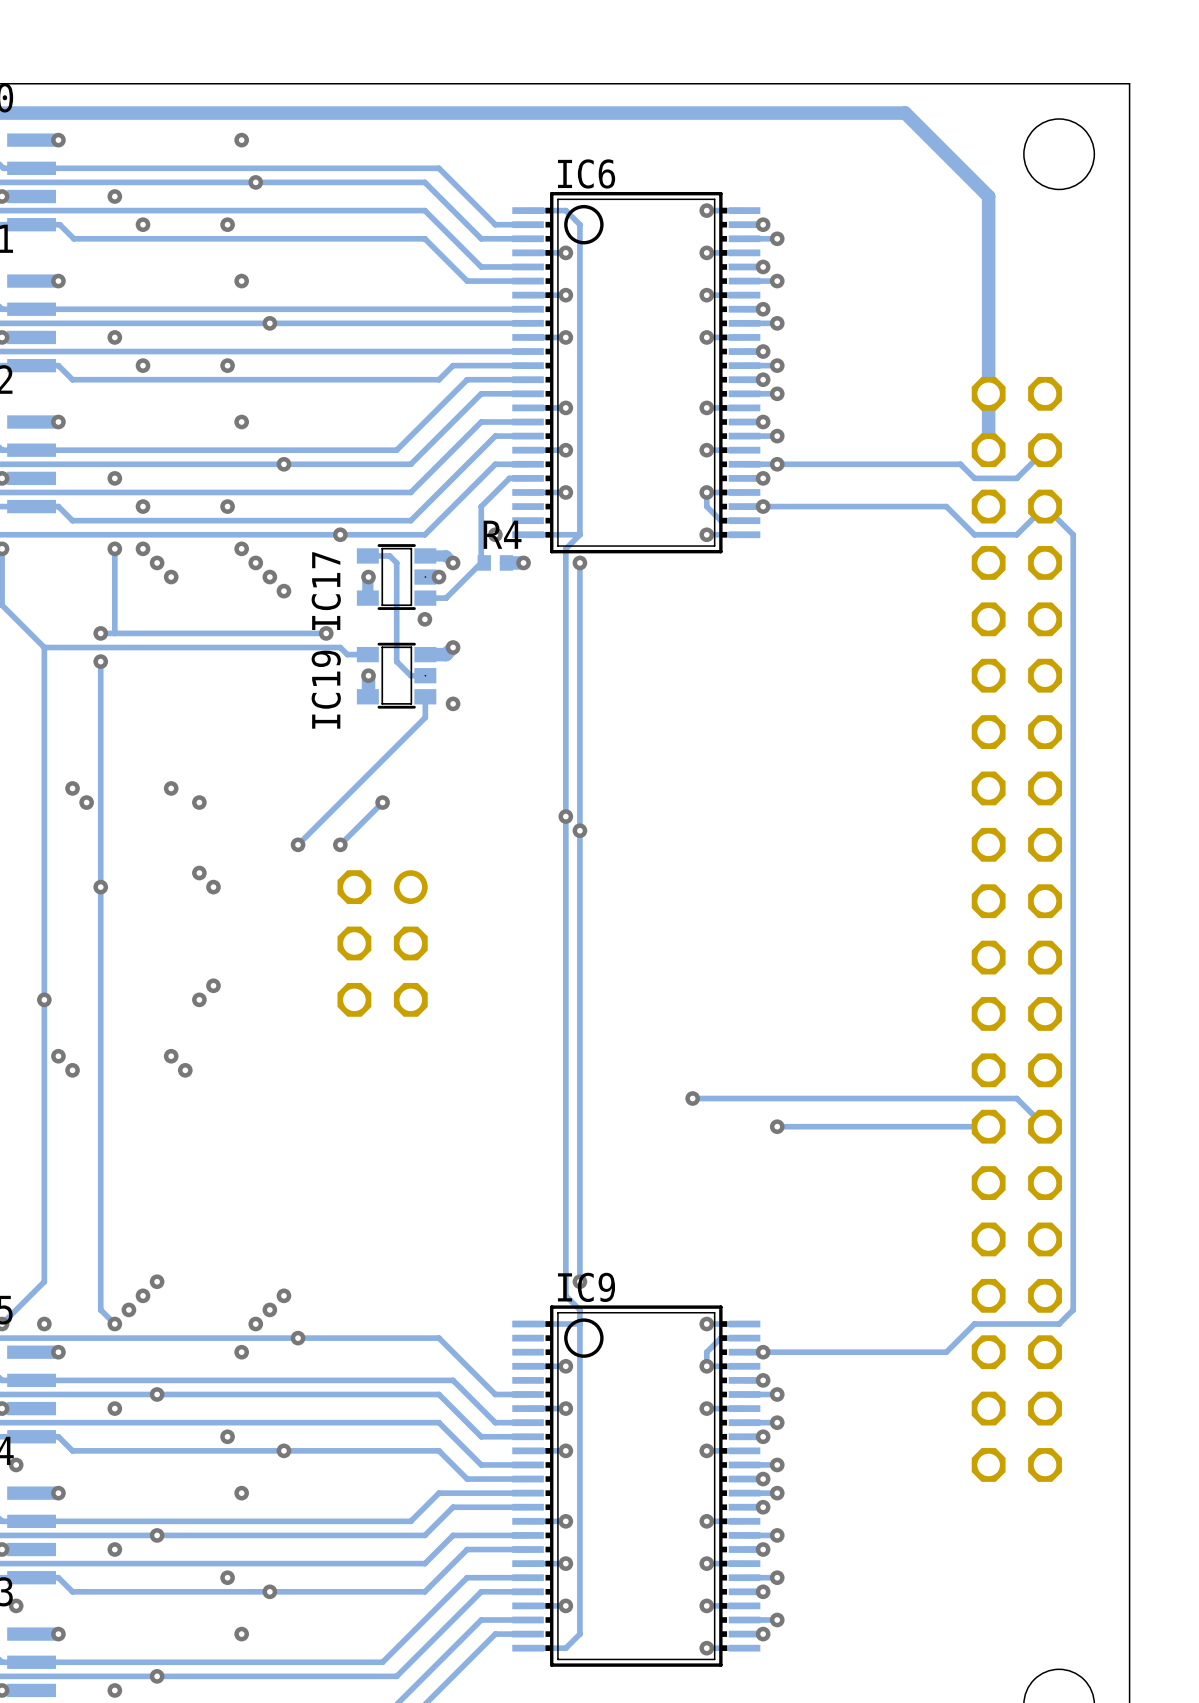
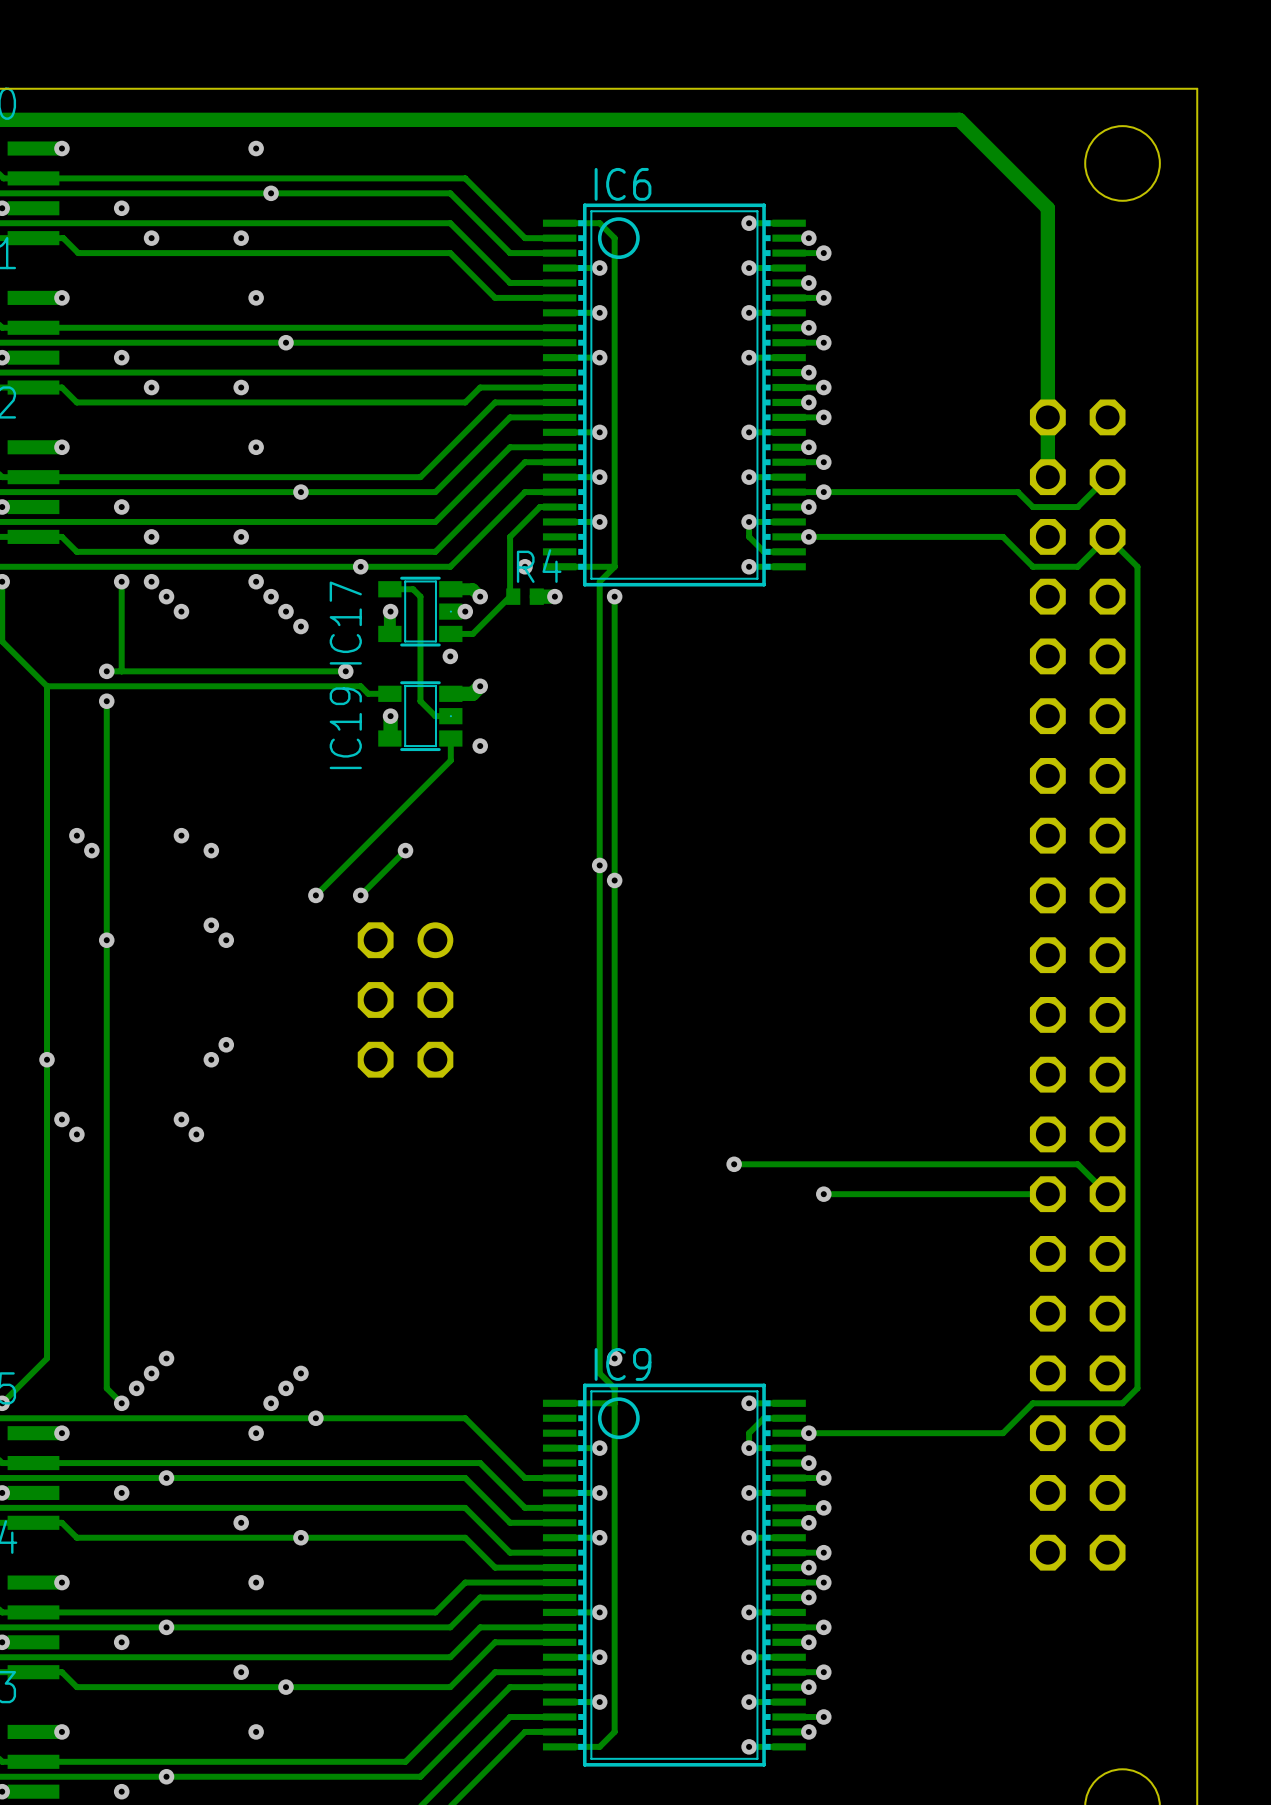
via: (44, 1324) -> none
via: (16, 1464) -> none
via: (16, 1605) -> none

